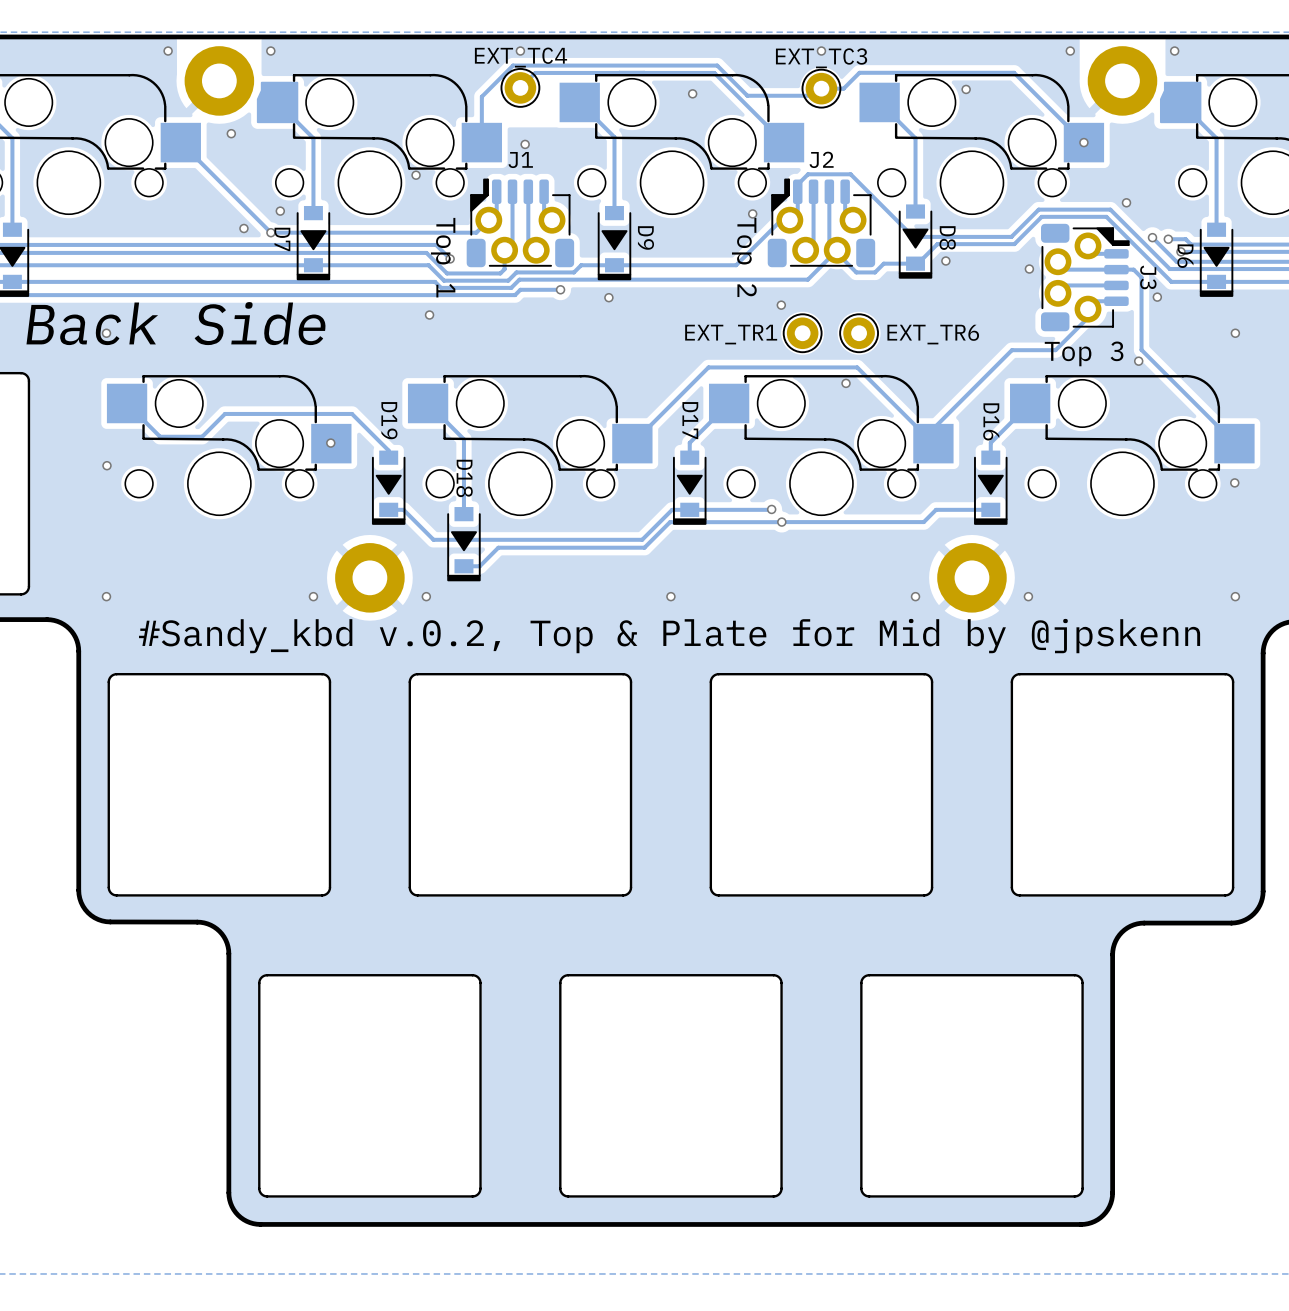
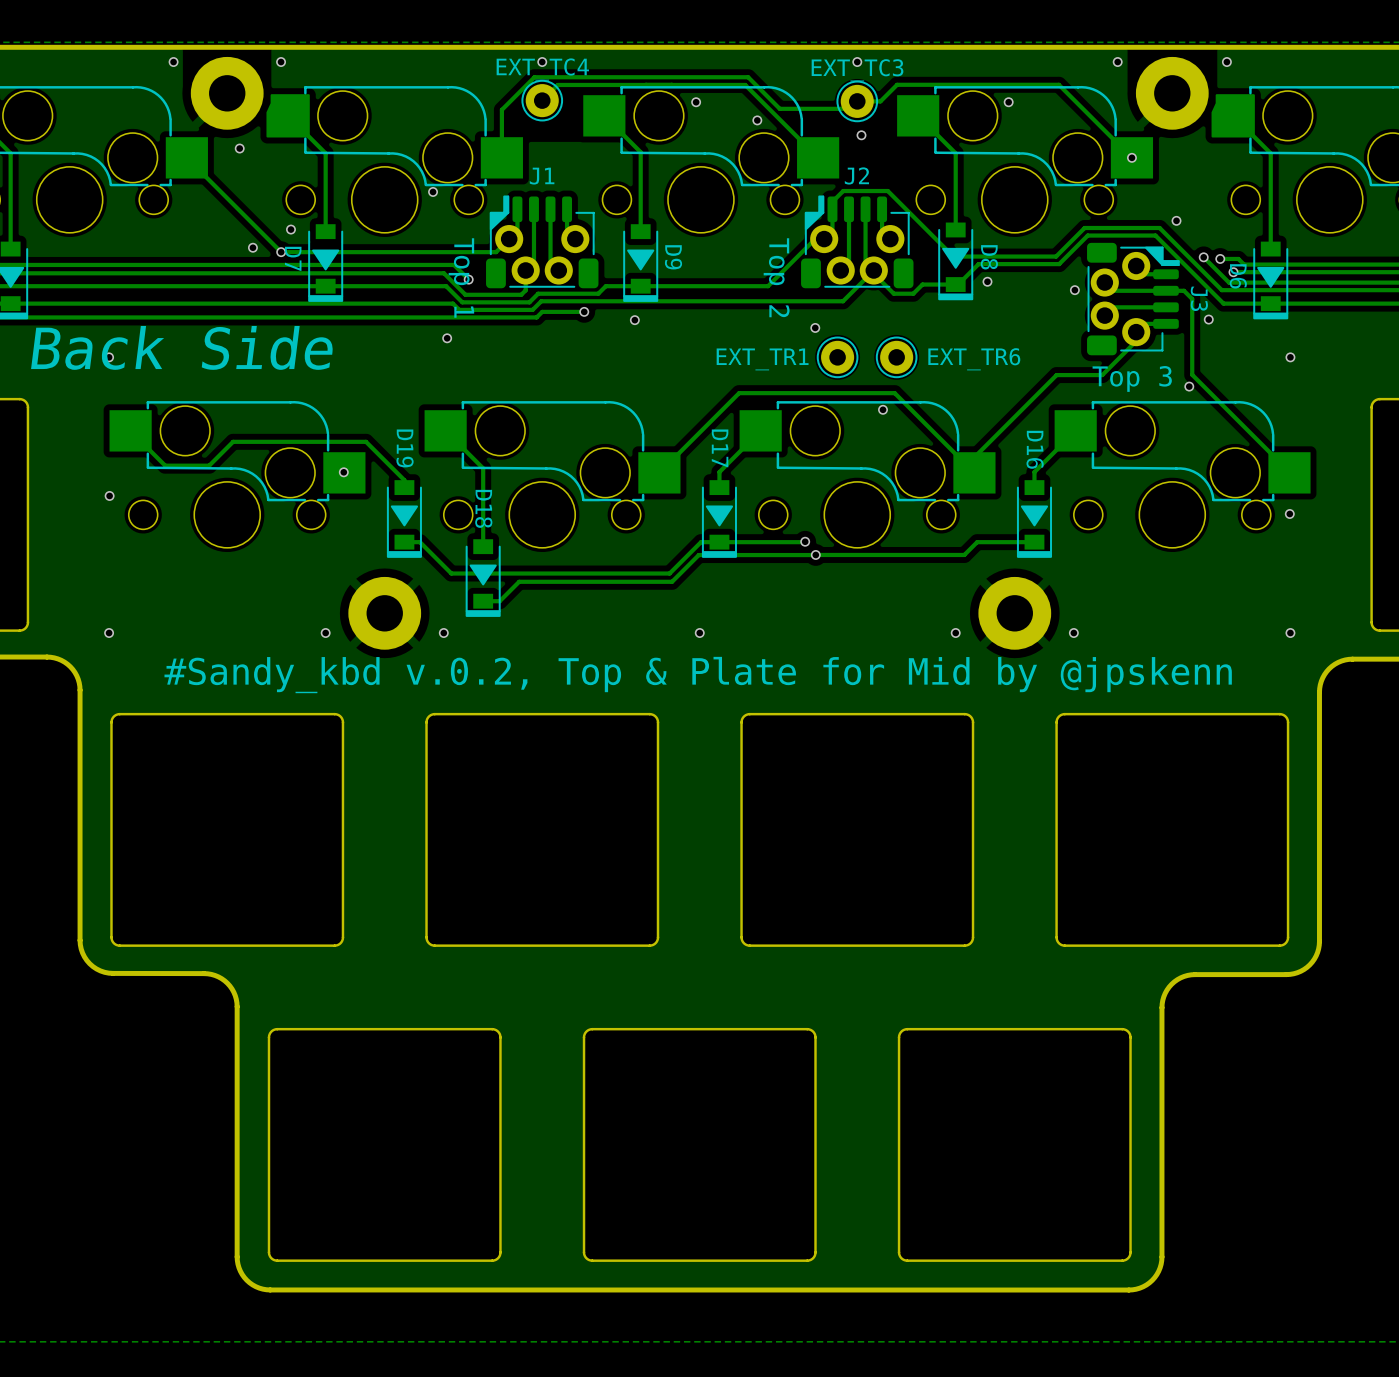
via: none -> (696, 102)
via: (692, 93) -> none
via: none -> (757, 120)
via: none -> (861, 135)
via: (525, 144) -> none
via: (752, 213) -> none

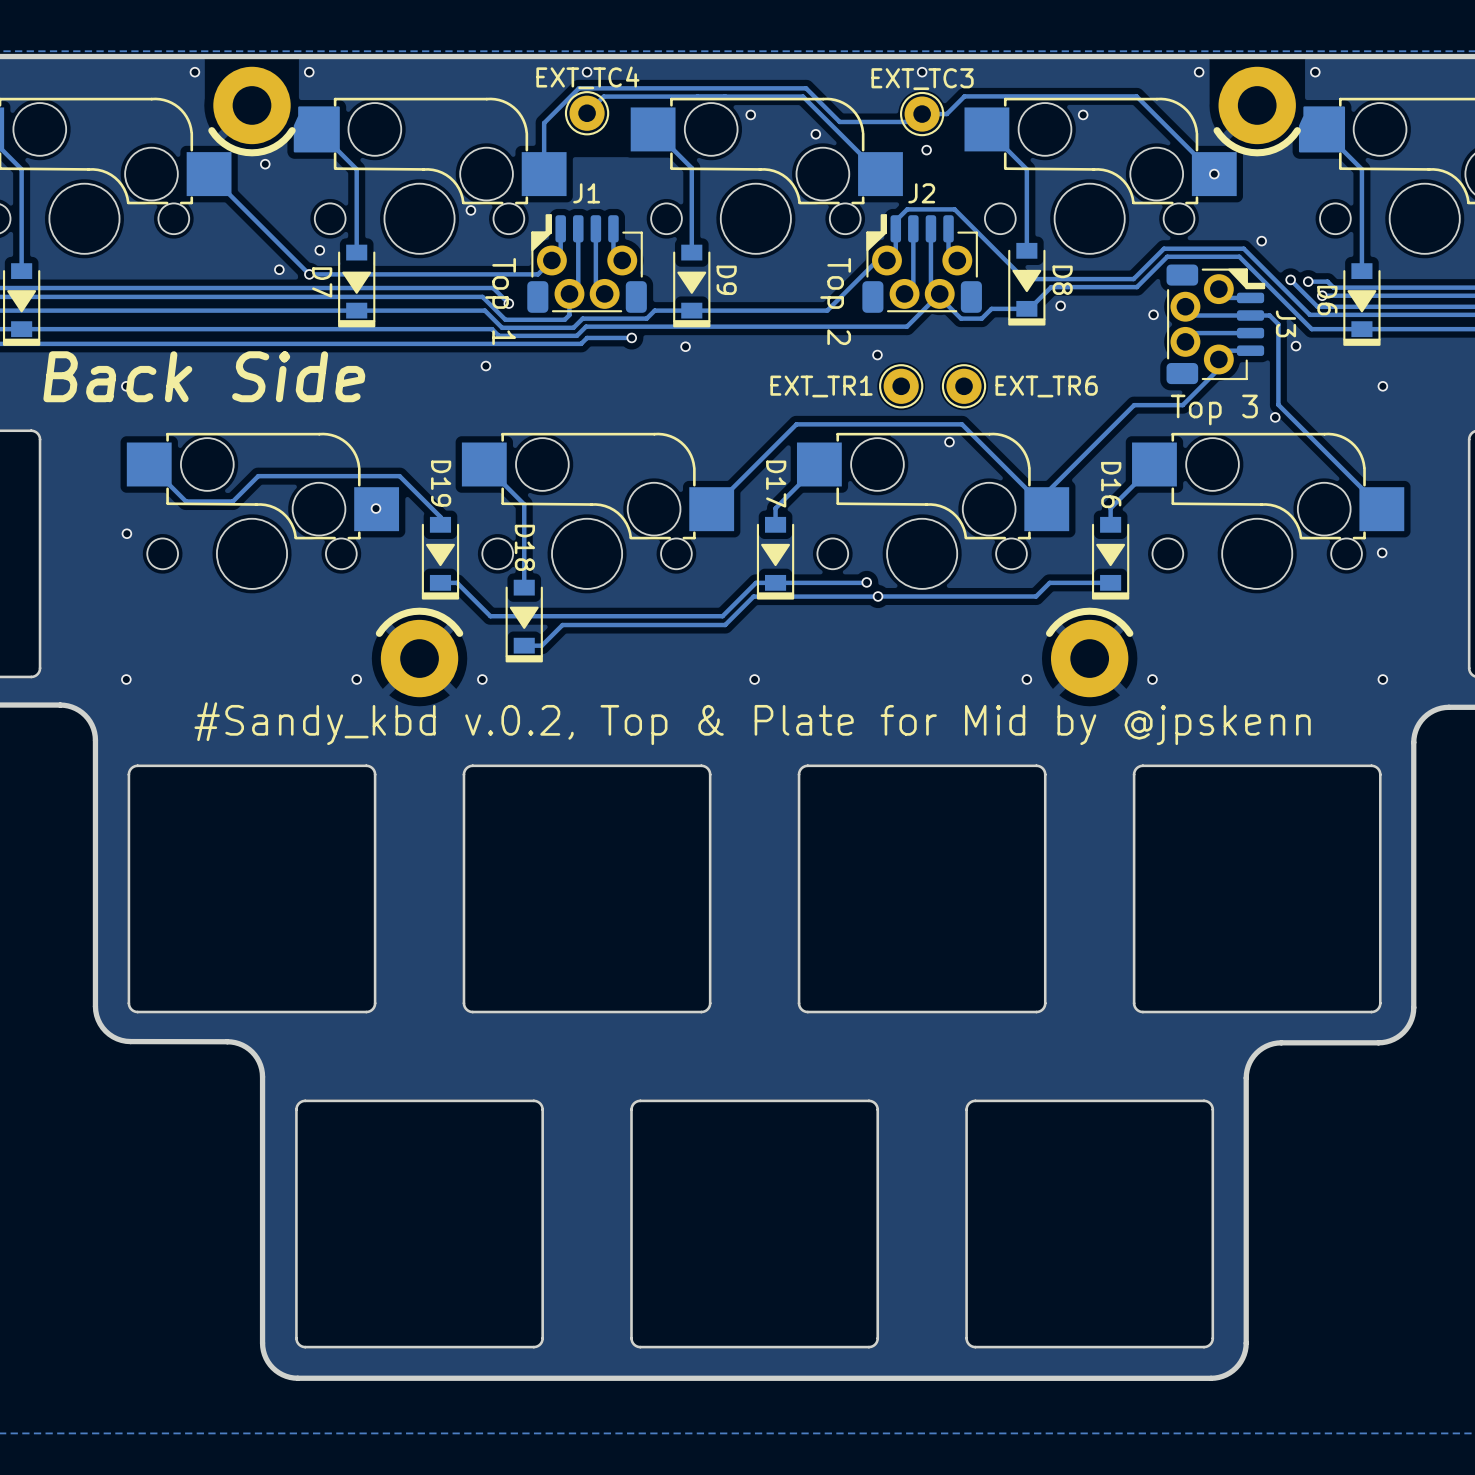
part side: top (227, 93) -> bottom (252, 111)
part side: top (1172, 93) -> bottom (1257, 111)
part side: top (384, 613) -> bottom (419, 652)
part side: top (1014, 613) -> bottom (1089, 652)

